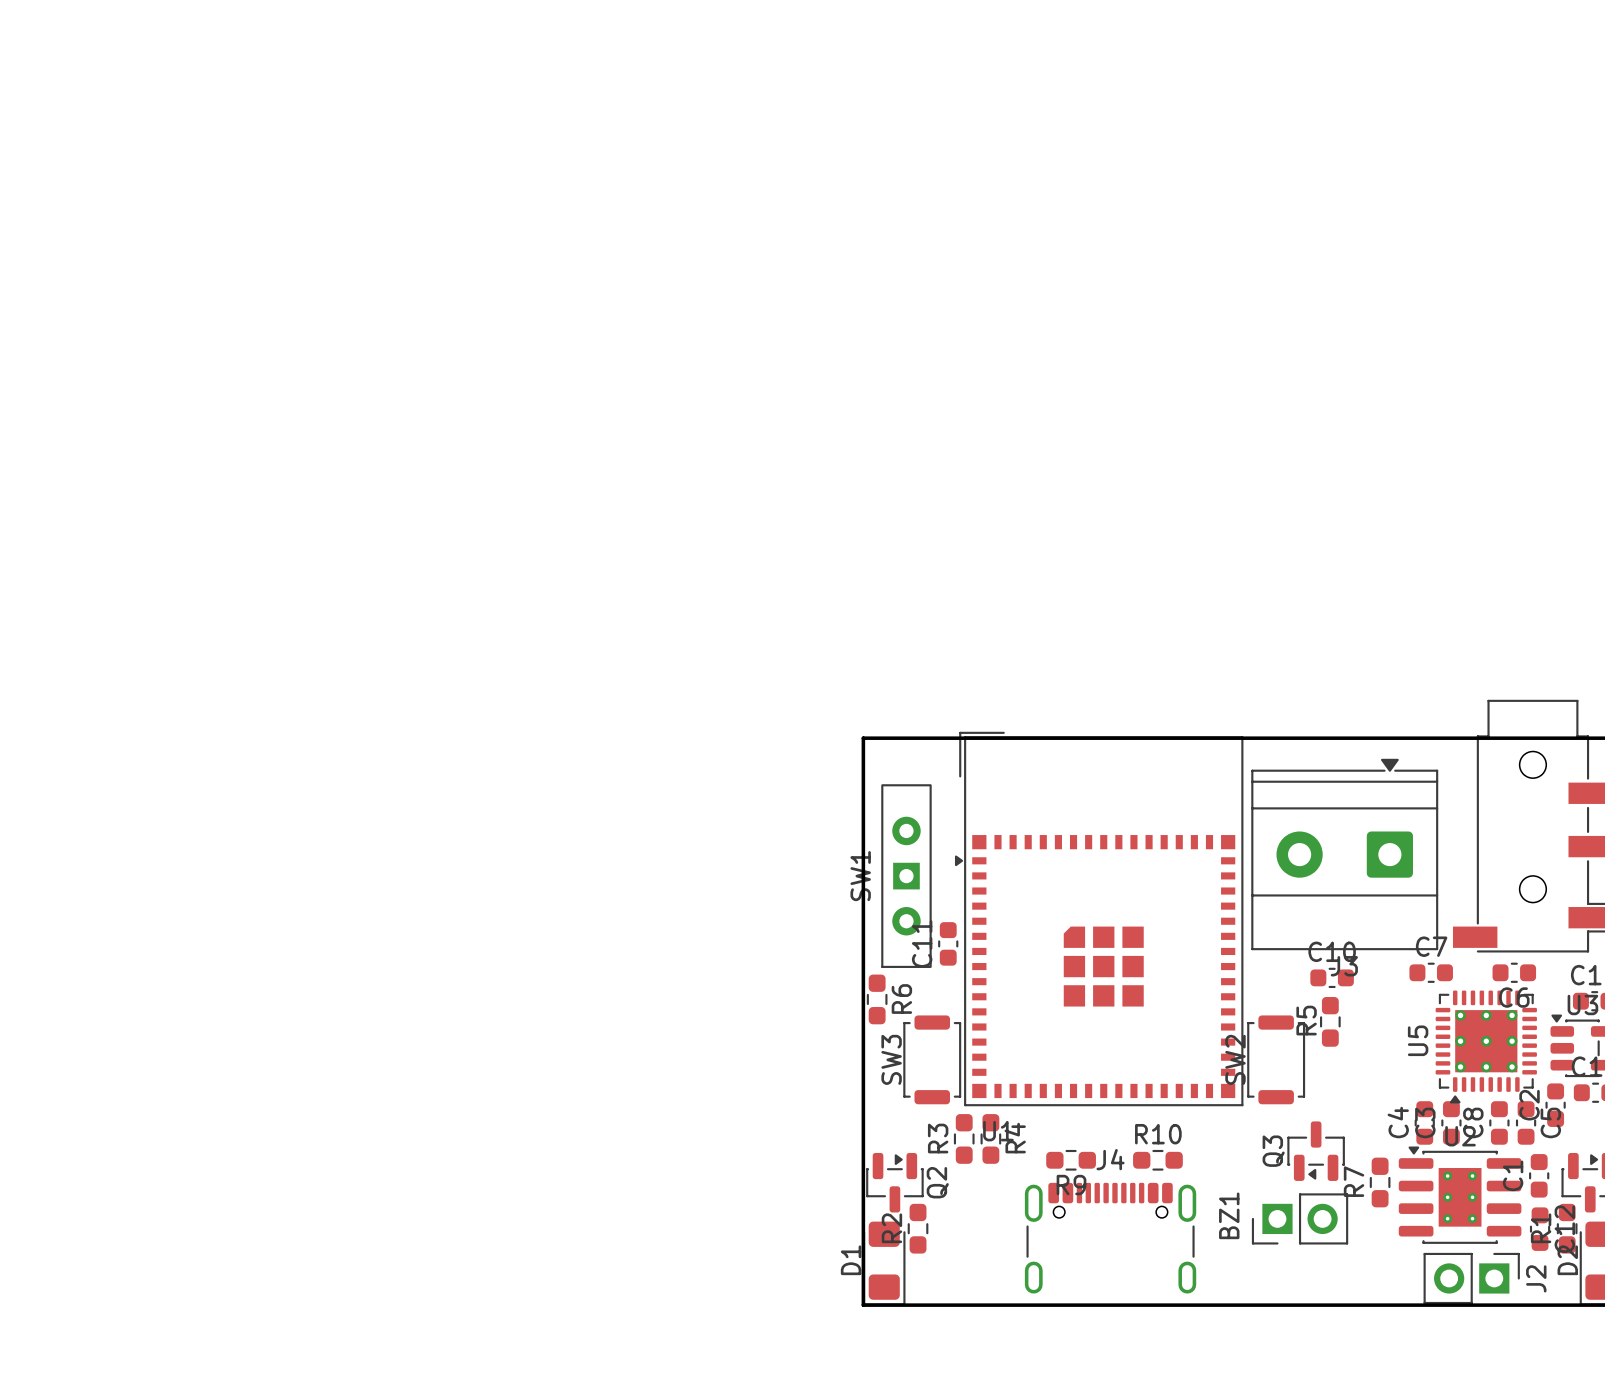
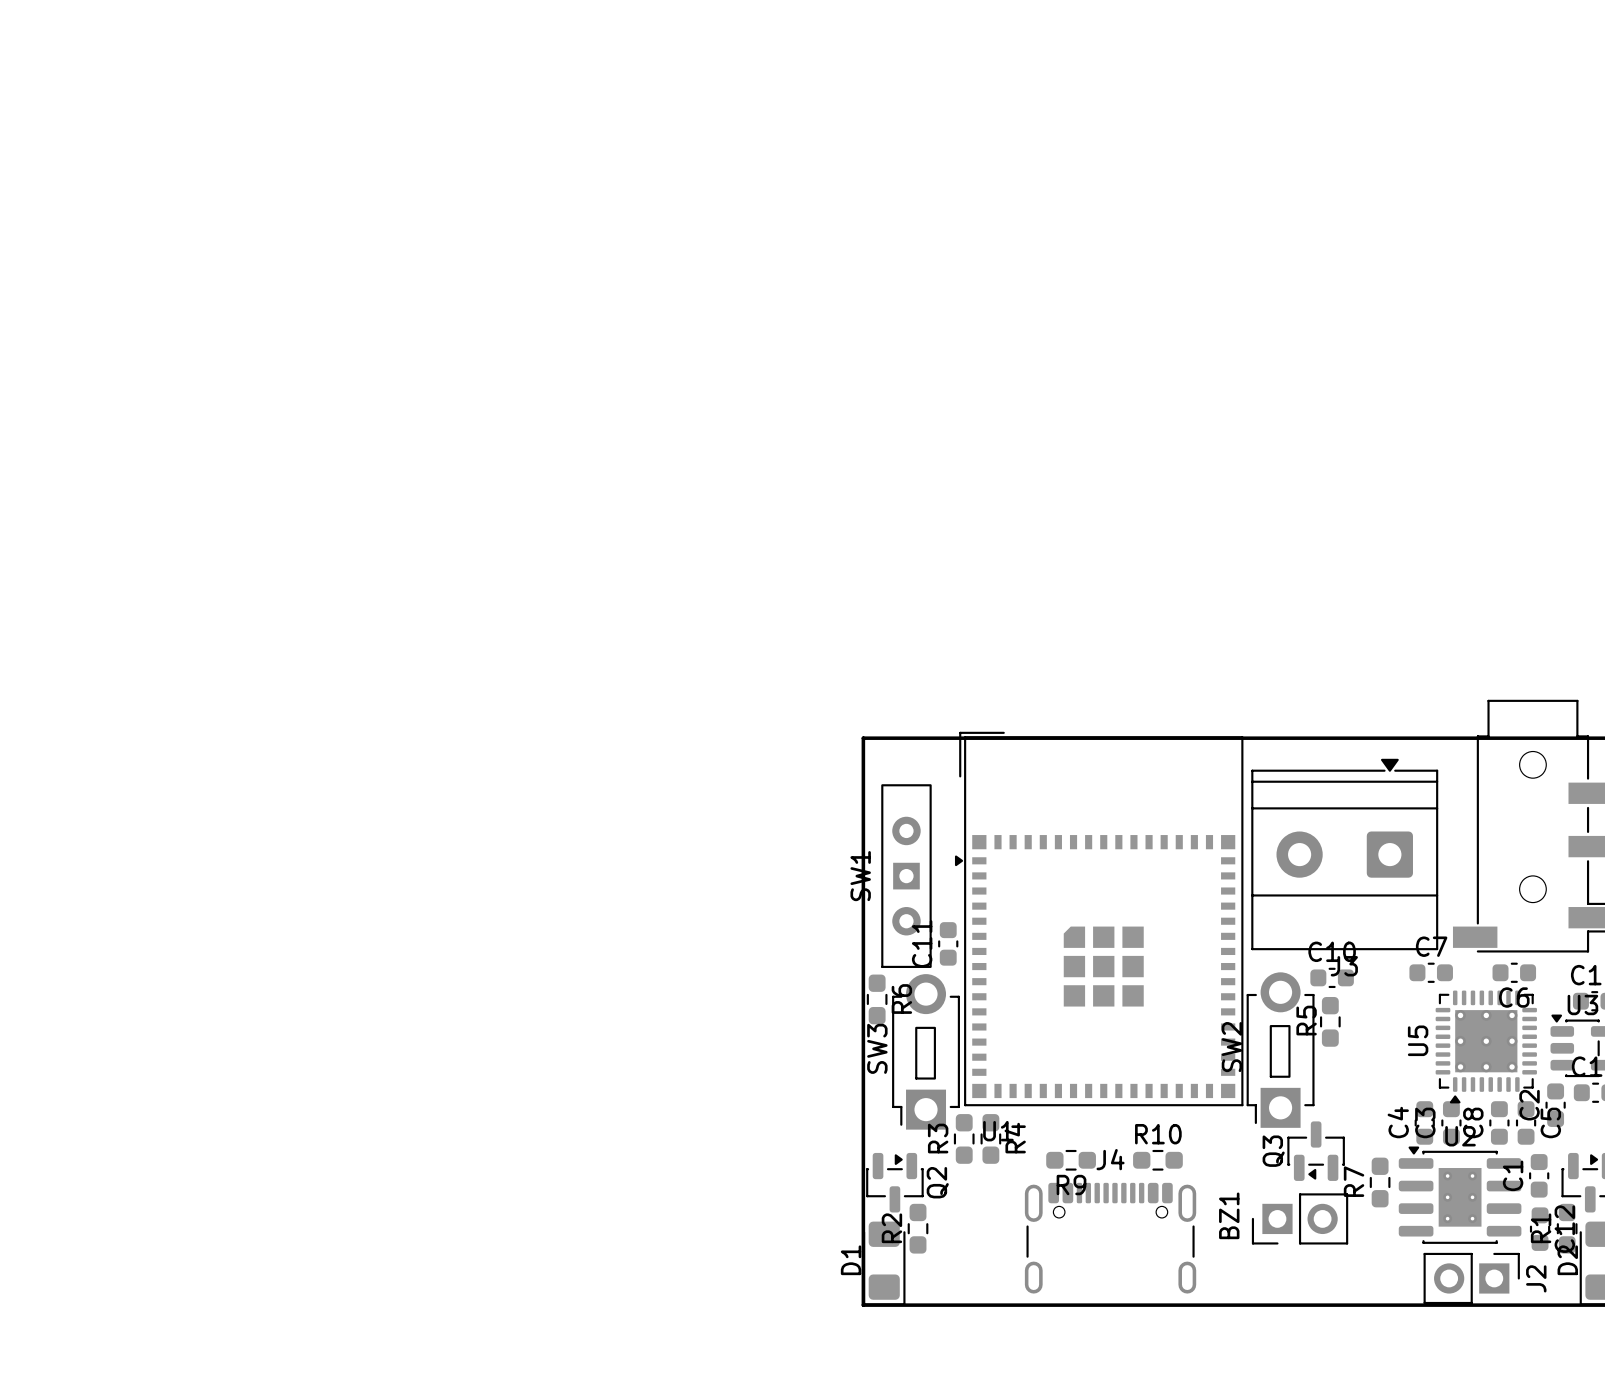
SW3 footprint: [903, 1015, 962, 1105] -> [892, 974, 960, 1130]
SW2 footprint: [1247, 1015, 1306, 1105] -> [1246, 972, 1315, 1128]

